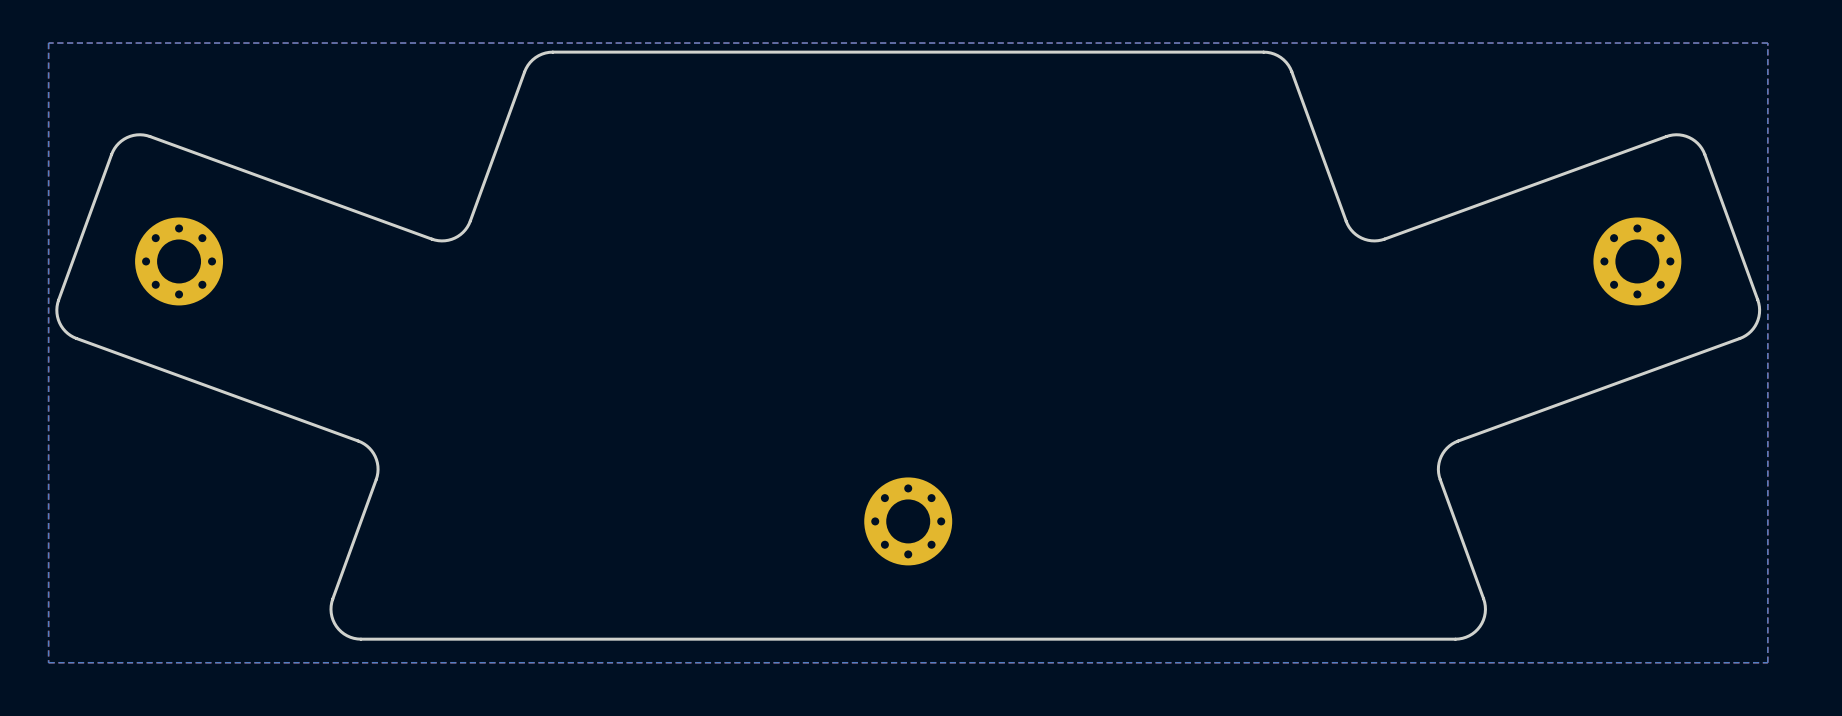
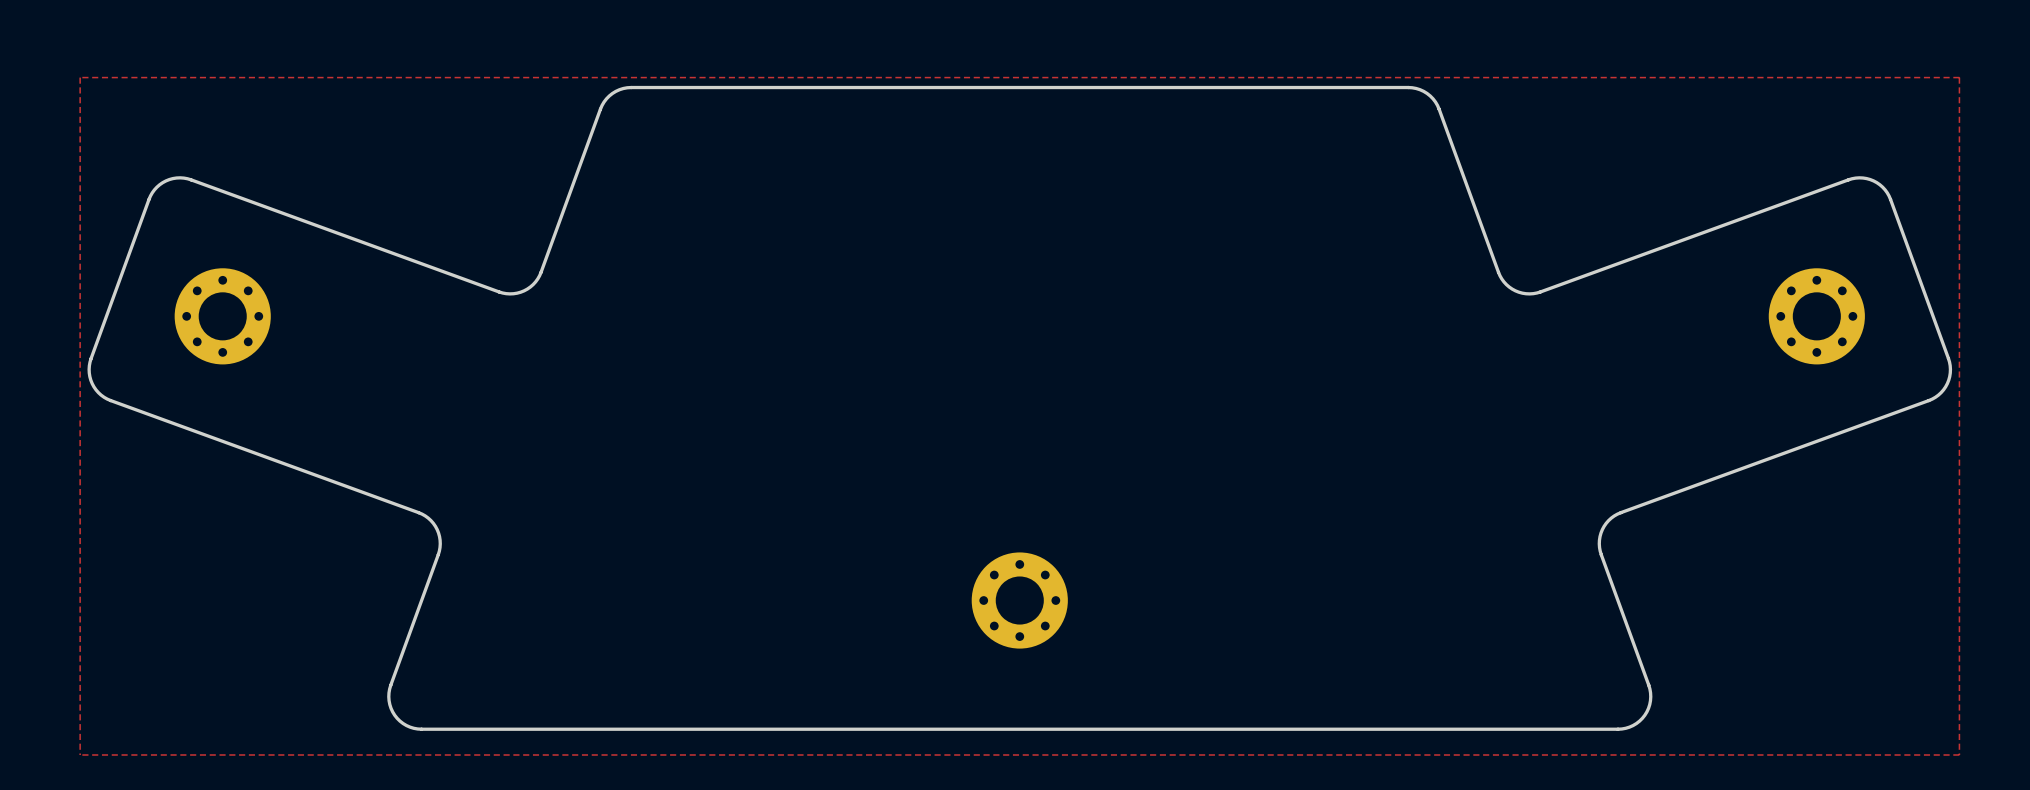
bottom zone outline: (1767, 43) (1767, 662) (48, 662) (48, 43) (1767, 43) -> none

